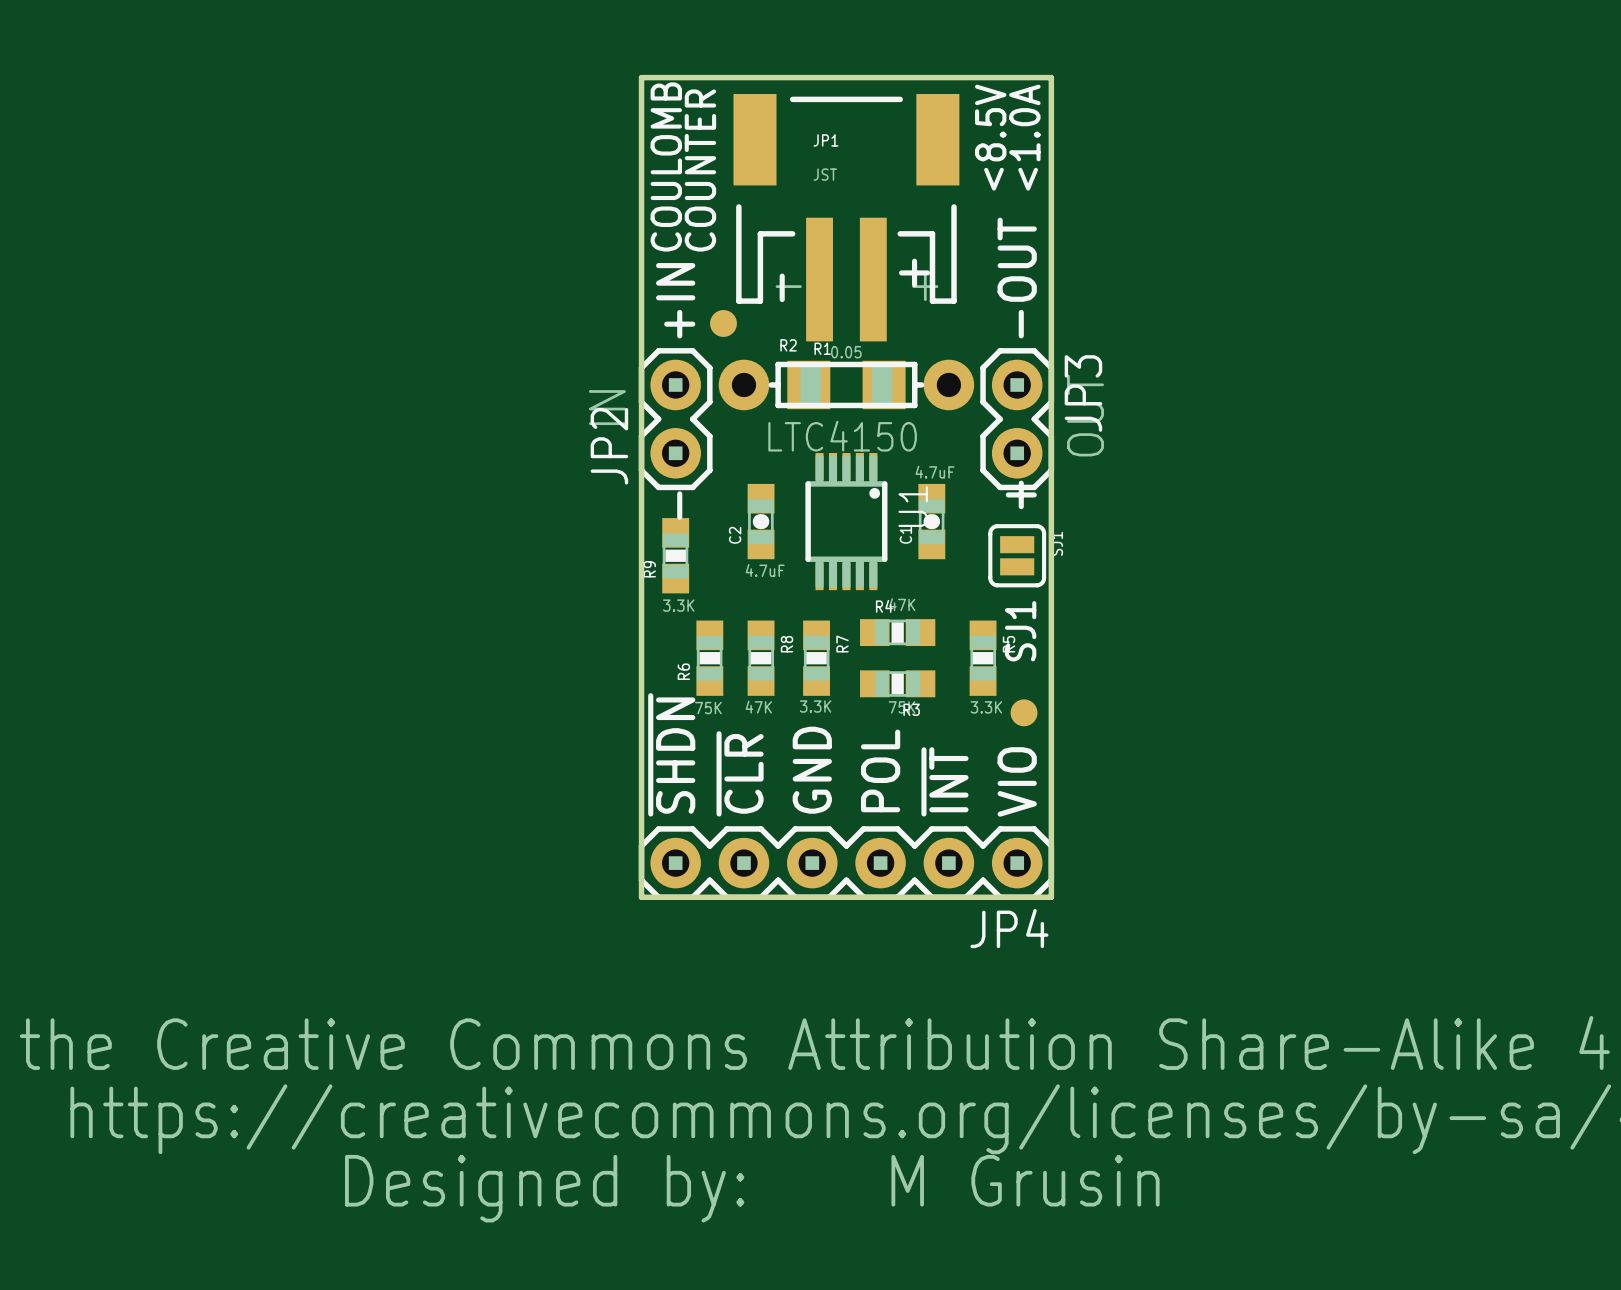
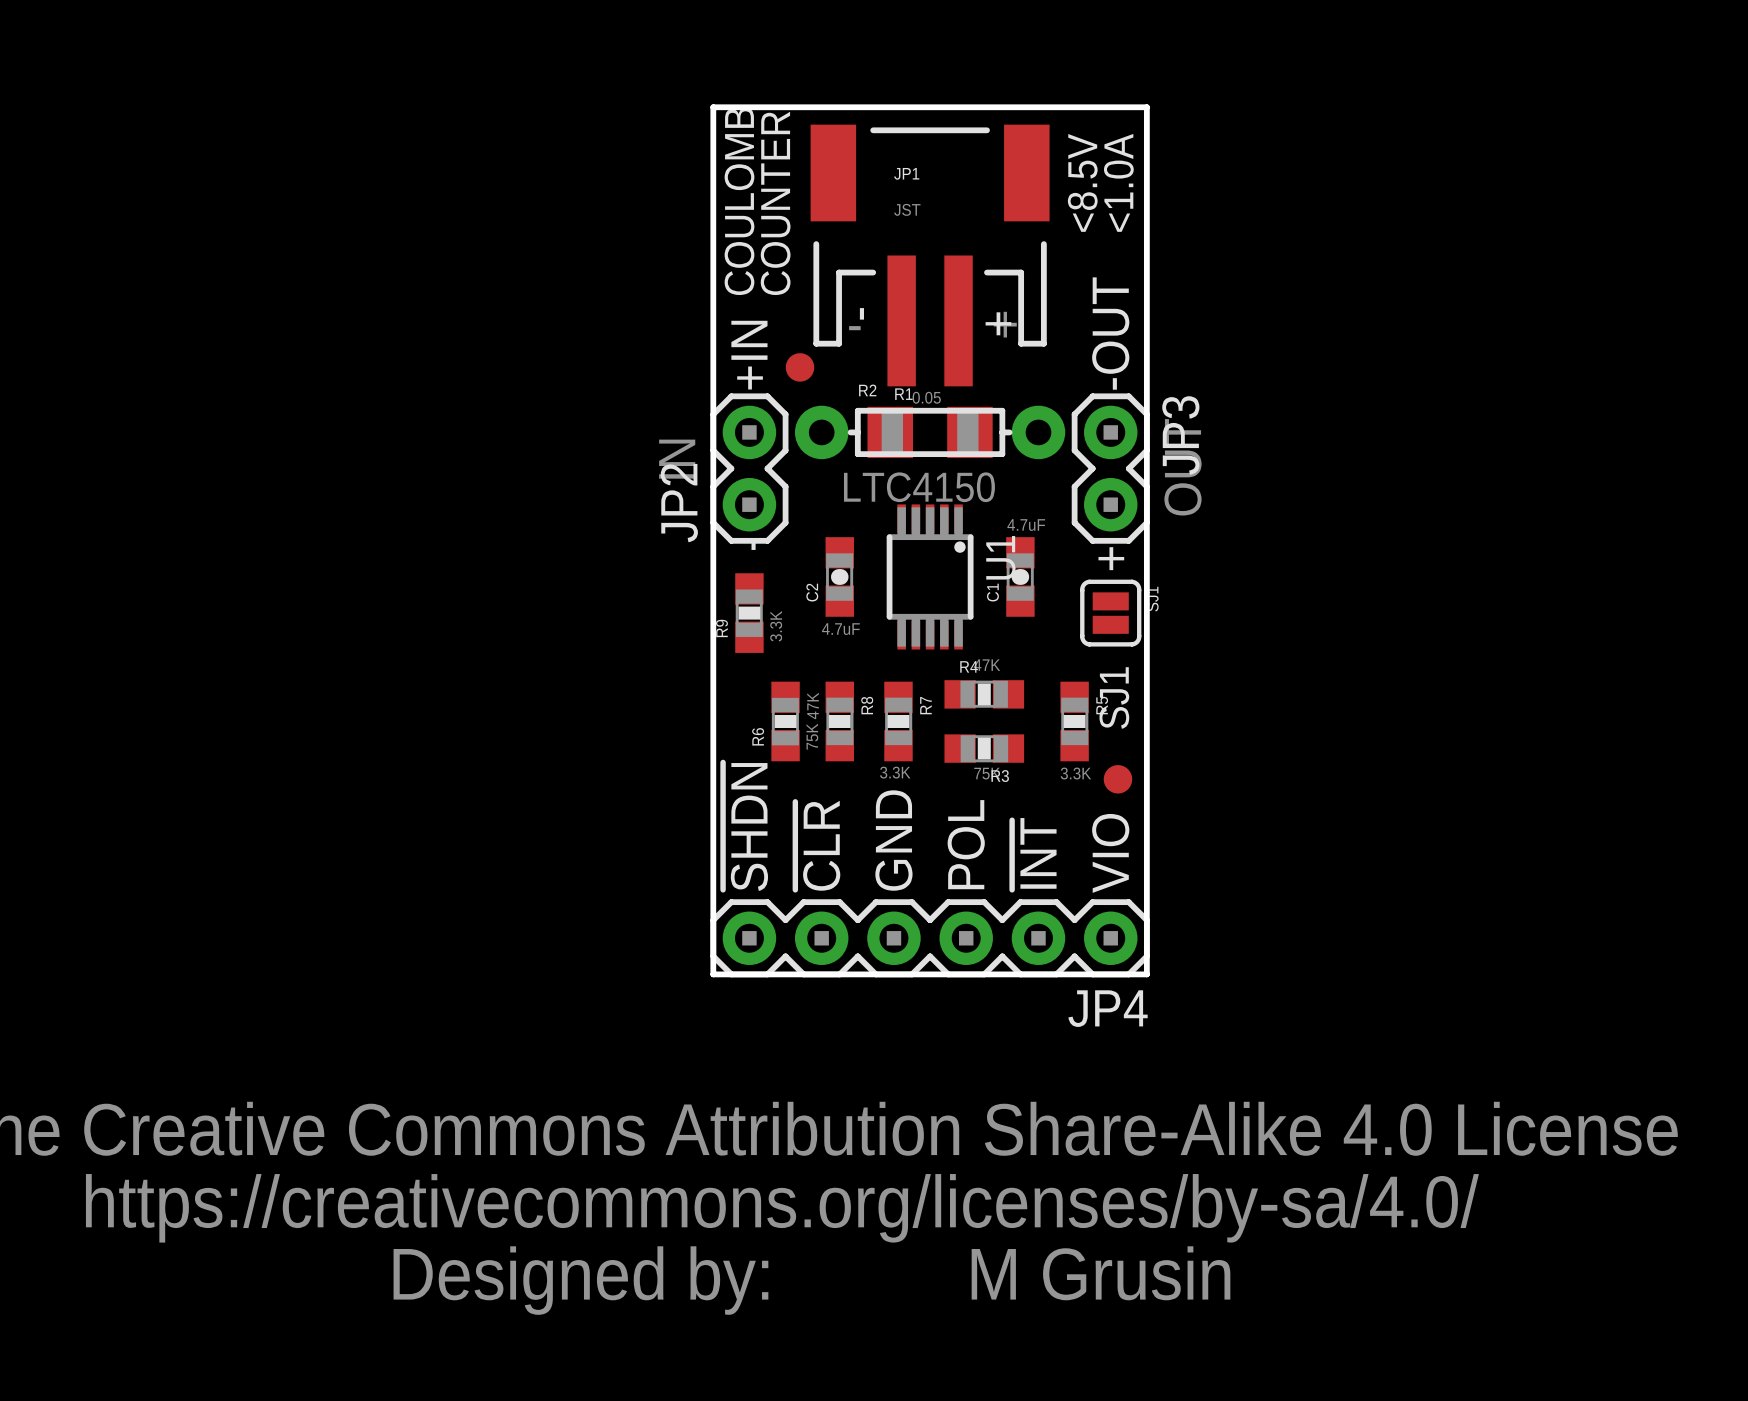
R9 value rotation: 0° (678, 605) -> 90° counterclockwise (776, 626)
R9 value position: 3.3K (678, 605) -> 3.3K (776, 626)
R8 value rotation: 0° (758, 707) -> 90° counterclockwise (813, 705)
R8 value position: 47K (758, 707) -> 47K (813, 705)
R6 value rotation: 0° (708, 708) -> 90° counterclockwise (812, 736)
R6 value position: 75K (708, 708) -> 75K (812, 736)

